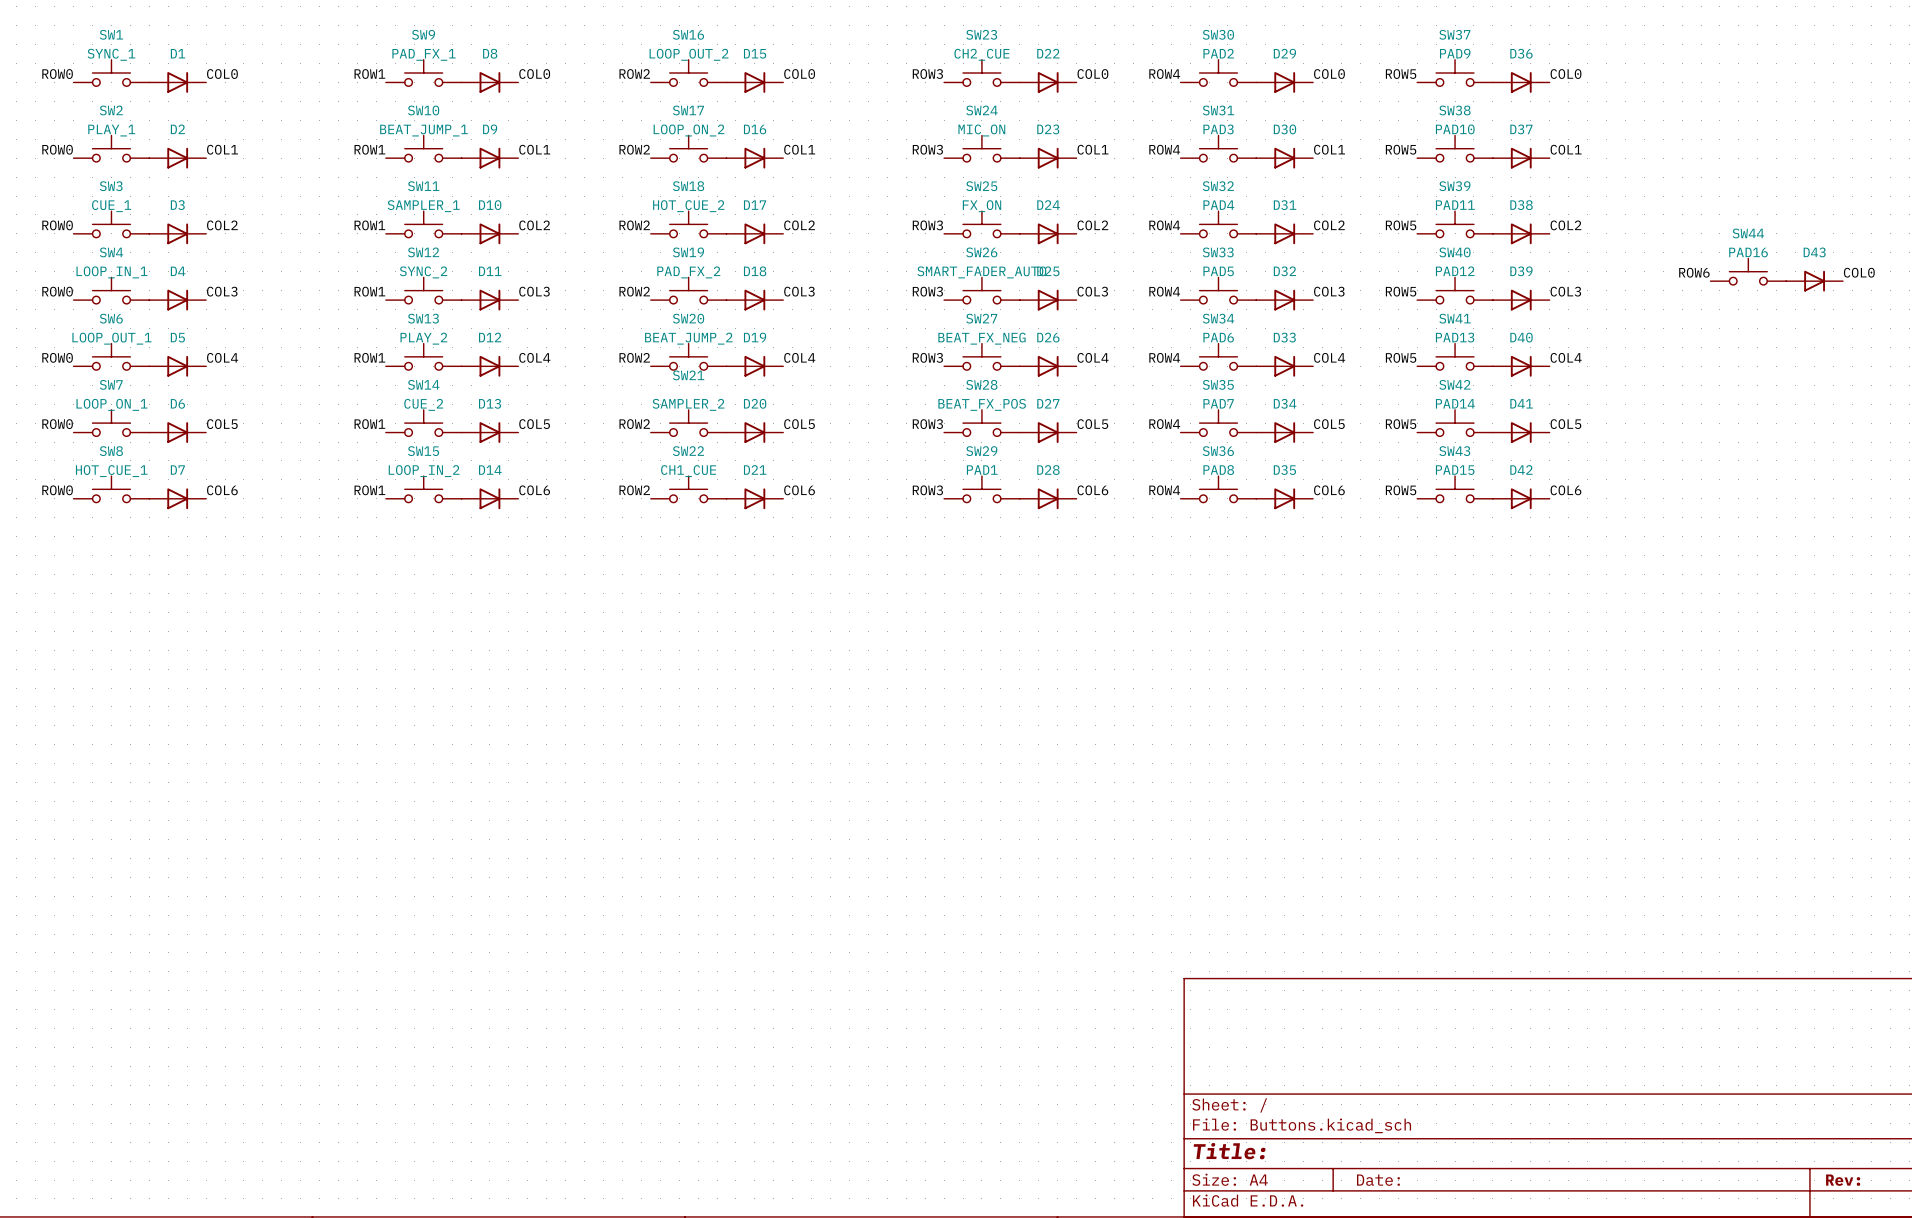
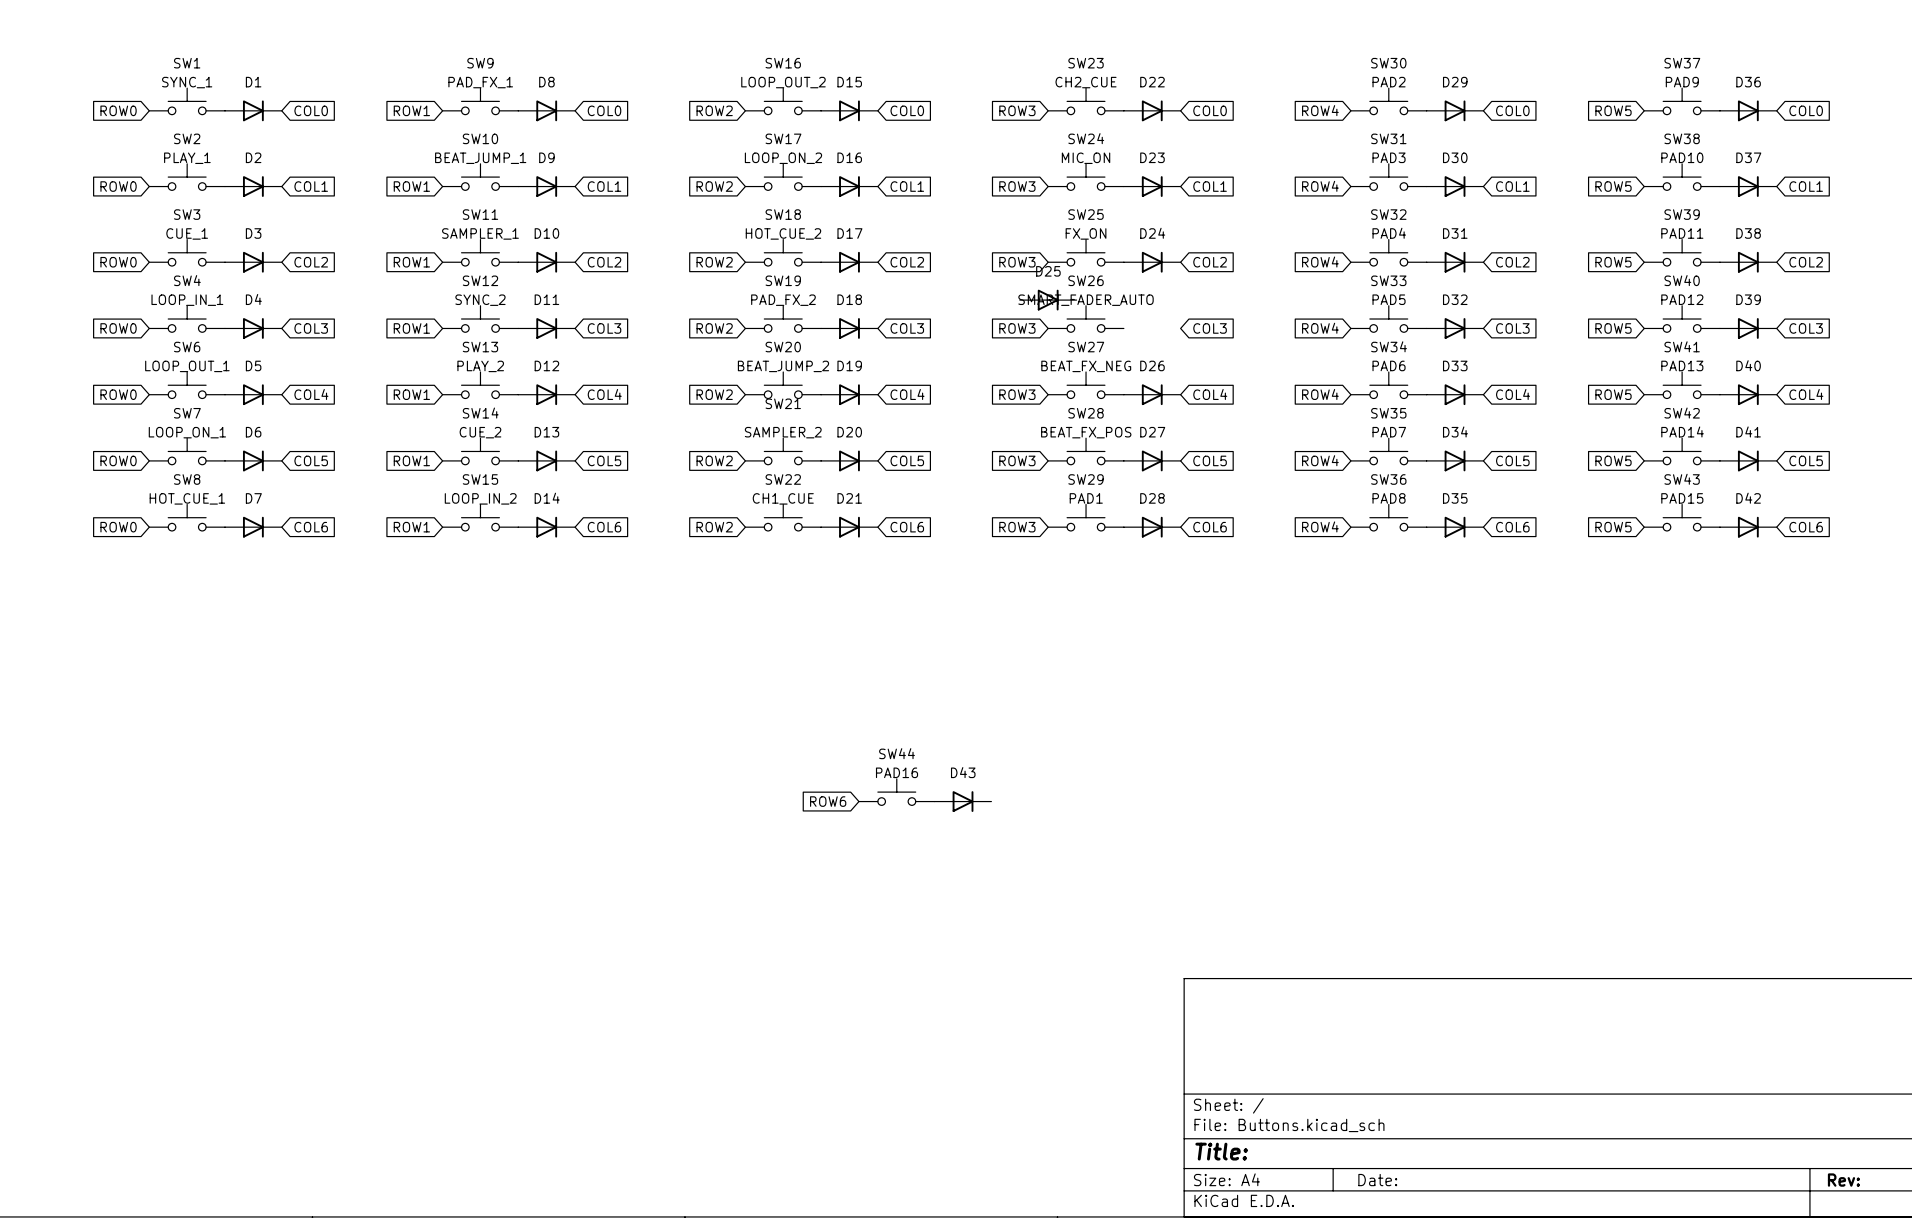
SW1 position: (111, 73) -> (187, 101)
SW9 position: (423, 73) -> (480, 101)
SW16 position: (688, 73) -> (783, 101)
SW23 position: (981, 73) -> (1086, 101)
SW30 position: (1218, 73) -> (1388, 101)
SW37 position: (1455, 73) -> (1682, 101)
label: ROW0 (57, 74) -> none
label: COL0 (222, 74) -> none
label: ROW1 (369, 74) -> none
label: COL0 (534, 74) -> none
label: ROW2 (634, 74) -> none
label: COL0 (799, 74) -> none
label: ROW3 (927, 74) -> none
label: COL0 (1092, 74) -> none
label: ROW4 (1164, 74) -> none
label: COL0 (1329, 74) -> none
label: ROW5 (1401, 74) -> none
label: COL0 (1566, 74) -> none
D1 position: (177, 82) -> (253, 110)
D8 position: (489, 82) -> (546, 110)
D15 position: (754, 82) -> (849, 110)
D22 position: (1048, 82) -> (1152, 110)
D29 position: (1284, 82) -> (1455, 110)
D36 position: (1521, 82) -> (1748, 110)
global label: none -> ROW0 (118, 110)
global label: none -> COL0 (311, 110)
global label: none -> ROW1 (411, 110)
global label: none -> COL0 (604, 110)
global label: none -> ROW2 (714, 110)
global label: none -> COL0 (907, 110)
global label: none -> ROW3 (1017, 110)
global label: none -> COL0 (1210, 110)
global label: none -> ROW4 (1320, 110)
global label: none -> COL0 (1512, 110)
global label: none -> ROW5 (1613, 110)
global label: none -> COL0 (1806, 110)
SW2 position: (111, 148) -> (187, 177)
SW10 position: (423, 148) -> (480, 177)
SW17 position: (688, 148) -> (783, 177)
SW24 position: (981, 148) -> (1086, 177)
SW31 position: (1218, 148) -> (1388, 177)
SW38 position: (1455, 148) -> (1682, 177)
label: ROW0 (57, 149) -> none
label: COL1 (222, 149) -> none
label: ROW1 (369, 149) -> none
label: COL1 (534, 149) -> none
label: ROW2 (634, 149) -> none
label: COL1 (799, 149) -> none
label: ROW3 (927, 149) -> none
label: COL1 (1092, 149) -> none
label: ROW4 (1164, 149) -> none
label: COL1 (1329, 149) -> none
label: ROW5 (1401, 149) -> none
label: COL1 (1566, 149) -> none
D2 position: (177, 158) -> (253, 186)
D9 position: (489, 158) -> (546, 186)
D16 position: (754, 158) -> (849, 186)
D23 position: (1048, 158) -> (1152, 186)
D30 position: (1284, 158) -> (1455, 186)
D37 position: (1521, 158) -> (1748, 186)
global label: none -> ROW0 (118, 186)
global label: none -> COL1 (311, 186)
global label: none -> ROW1 (411, 186)
global label: none -> COL1 (604, 186)
global label: none -> ROW2 (714, 186)
global label: none -> COL1 (907, 186)
global label: none -> ROW3 (1017, 186)
global label: none -> COL1 (1210, 186)
global label: none -> ROW4 (1320, 186)
global label: none -> COL1 (1512, 186)
global label: none -> ROW5 (1613, 186)
global label: none -> COL1 (1806, 186)
SW3 position: (111, 224) -> (187, 252)
SW11 position: (423, 224) -> (480, 252)
SW18 position: (688, 224) -> (783, 252)
SW25 position: (981, 224) -> (1086, 252)
SW32 position: (1218, 224) -> (1388, 252)
SW39 position: (1455, 224) -> (1682, 252)
label: ROW0 (57, 225) -> none
label: COL2 (222, 225) -> none
label: ROW1 (369, 225) -> none
label: COL2 (534, 225) -> none
label: ROW2 (634, 225) -> none
label: COL2 (799, 225) -> none
label: ROW3 (927, 225) -> none
label: COL2 (1092, 225) -> none
label: ROW4 (1164, 225) -> none
label: COL2 (1329, 225) -> none
label: ROW5 (1401, 225) -> none
label: COL2 (1565, 225) -> none
D3 position: (177, 233) -> (253, 262)
D10 position: (489, 233) -> (546, 262)
D17 position: (754, 233) -> (849, 262)
D24 position: (1048, 233) -> (1152, 262)
D31 position: (1284, 233) -> (1455, 262)
D38 position: (1521, 233) -> (1748, 262)
global label: none -> ROW0 (118, 262)
global label: none -> COL2 (311, 262)
global label: none -> ROW1 (411, 262)
global label: none -> COL2 (604, 262)
global label: none -> ROW2 (714, 262)
global label: none -> COL2 (907, 262)
global label: none -> ROW3 (1017, 262)
global label: none -> COL2 (1210, 262)
global label: none -> ROW4 (1320, 262)
global label: none -> COL2 (1512, 262)
global label: none -> ROW5 (1613, 262)
global label: none -> COL2 (1806, 262)
SW44 position: (1748, 271) -> (896, 792)
label: ROW6 (1694, 272) -> none
label: COL0 (1859, 272) -> none
D43 position: (1814, 281) -> (963, 801)
SW4 position: (111, 290) -> (187, 319)
SW12 position: (423, 290) -> (480, 319)
SW19 position: (688, 290) -> (783, 319)
SW26 position: (981, 290) -> (1086, 319)
SW33 position: (1218, 290) -> (1388, 319)
SW40 position: (1455, 290) -> (1682, 319)
label: ROW0 (57, 291) -> none
label: COL3 (222, 291) -> none
label: ROW1 (369, 291) -> none
label: COL3 (534, 291) -> none
label: ROW2 (634, 291) -> none
label: COL3 (799, 291) -> none
label: ROW3 (927, 291) -> none
label: COL3 (1092, 291) -> none
label: ROW4 (1164, 291) -> none
label: COL3 (1329, 291) -> none
label: ROW5 (1401, 291) -> none
label: COL3 (1565, 291) -> none
D4 position: (177, 300) -> (253, 328)
D11 position: (489, 300) -> (546, 328)
D18 position: (754, 300) -> (849, 328)
D32 position: (1284, 300) -> (1455, 328)
D39 position: (1521, 300) -> (1748, 328)
global label: none -> ROW0 (118, 328)
global label: none -> COL3 (311, 328)
global label: none -> ROW1 (411, 328)
global label: none -> COL3 (604, 328)
global label: none -> ROW2 (714, 328)
global label: none -> COL3 (907, 328)
global label: none -> ROW3 (1017, 328)
global label: none -> COL3 (1210, 328)
global label: none -> ROW4 (1320, 328)
global label: none -> COL3 (1512, 328)
global label: none -> ROW5 (1613, 328)
global label: none -> COL3 (1806, 328)
SW6 position: (111, 356) -> (187, 385)
SW13 position: (423, 356) -> (480, 385)
SW20 position: (688, 356) -> (783, 385)
SW27 position: (981, 356) -> (1086, 385)
SW34 position: (1218, 356) -> (1388, 385)
SW41 position: (1455, 356) -> (1682, 385)
label: ROW0 (57, 357) -> none
label: COL4 (222, 357) -> none
label: ROW1 (369, 357) -> none
label: COL4 (534, 357) -> none
label: ROW2 (634, 357) -> none
label: COL4 (799, 357) -> none
label: ROW3 (927, 357) -> none
label: COL4 (1093, 357) -> none
label: ROW4 (1164, 357) -> none
label: COL4 (1329, 357) -> none
label: ROW5 (1401, 357) -> none
label: COL4 (1566, 357) -> none
D5 position: (177, 366) -> (253, 394)
D12 position: (489, 366) -> (546, 394)
D19 position: (754, 366) -> (849, 394)
D26 position: (1048, 366) -> (1152, 394)
D33 position: (1284, 366) -> (1455, 394)
D40 position: (1521, 366) -> (1748, 394)
global label: none -> ROW0 (118, 394)
global label: none -> COL4 (311, 394)
global label: none -> ROW1 (411, 394)
global label: none -> COL4 (604, 394)
global label: none -> ROW2 (714, 394)
global label: none -> COL4 (907, 394)
global label: none -> ROW3 (1017, 394)
global label: none -> COL4 (1210, 394)
global label: none -> ROW4 (1320, 394)
global label: none -> COL4 (1513, 394)
global label: none -> ROW5 (1613, 394)
global label: none -> COL4 (1806, 394)
SW7 position: (111, 423) -> (187, 451)
SW14 position: (423, 423) -> (480, 451)
SW21 position: (688, 423) -> (783, 451)
SW28 position: (981, 423) -> (1086, 451)
SW35 position: (1218, 423) -> (1388, 451)
SW42 position: (1455, 423) -> (1682, 451)
label: ROW0 (57, 424) -> none
label: COL5 (222, 424) -> none
label: ROW1 (369, 424) -> none
label: COL5 (534, 424) -> none
label: ROW2 (634, 424) -> none
label: COL5 (799, 424) -> none
label: ROW3 (927, 424) -> none
label: COL5 (1092, 424) -> none
label: ROW4 (1164, 424) -> none
label: COL5 (1329, 424) -> none
label: ROW5 (1401, 424) -> none
label: COL5 (1565, 424) -> none
D6 position: (177, 432) -> (253, 460)
D13 position: (489, 432) -> (546, 460)
D20 position: (754, 432) -> (849, 460)
D27 position: (1048, 432) -> (1152, 460)
D34 position: (1284, 432) -> (1455, 460)
D41 position: (1521, 432) -> (1748, 460)
global label: none -> ROW0 (118, 460)
global label: none -> COL5 (311, 460)
global label: none -> ROW1 (411, 460)
global label: none -> COL5 (604, 460)
global label: none -> ROW2 (714, 460)
global label: none -> COL5 (907, 460)
global label: none -> ROW3 (1017, 460)
global label: none -> COL5 (1210, 460)
global label: none -> ROW4 (1320, 460)
global label: none -> COL5 (1512, 460)
global label: none -> ROW5 (1613, 460)
global label: none -> COL5 (1806, 460)
SW8 position: (111, 489) -> (187, 517)
SW15 position: (423, 489) -> (480, 517)
SW22 position: (688, 489) -> (783, 517)
SW29 position: (981, 489) -> (1086, 517)
SW36 position: (1218, 489) -> (1388, 517)
SW43 position: (1455, 489) -> (1682, 517)
label: ROW0 (57, 490) -> none
label: COL6 (222, 490) -> none
label: ROW1 (369, 490) -> none
label: COL6 (534, 490) -> none
label: ROW2 (634, 490) -> none
label: COL6 (799, 490) -> none
label: ROW3 (927, 490) -> none
label: COL6 (1092, 490) -> none
label: ROW4 (1164, 490) -> none
label: COL6 (1329, 490) -> none
label: ROW5 (1401, 490) -> none
label: COL6 (1565, 490) -> none
D7 position: (177, 498) -> (253, 527)
D14 position: (489, 498) -> (546, 527)
D21 position: (754, 498) -> (849, 527)
D28 position: (1048, 498) -> (1152, 527)
D35 position: (1284, 498) -> (1455, 527)
D42 position: (1521, 498) -> (1748, 527)
global label: none -> ROW0 (118, 527)
global label: none -> COL6 (311, 527)
global label: none -> ROW1 (411, 527)
global label: none -> COL6 (604, 527)
global label: none -> ROW2 (714, 527)
global label: none -> COL6 (907, 527)
global label: none -> ROW3 (1017, 527)
global label: none -> COL6 (1210, 527)
global label: none -> ROW4 (1320, 526)
global label: none -> COL6 (1512, 527)
global label: none -> ROW5 (1613, 527)
global label: none -> COL6 (1806, 527)
global label: none -> ROW6 (828, 801)

